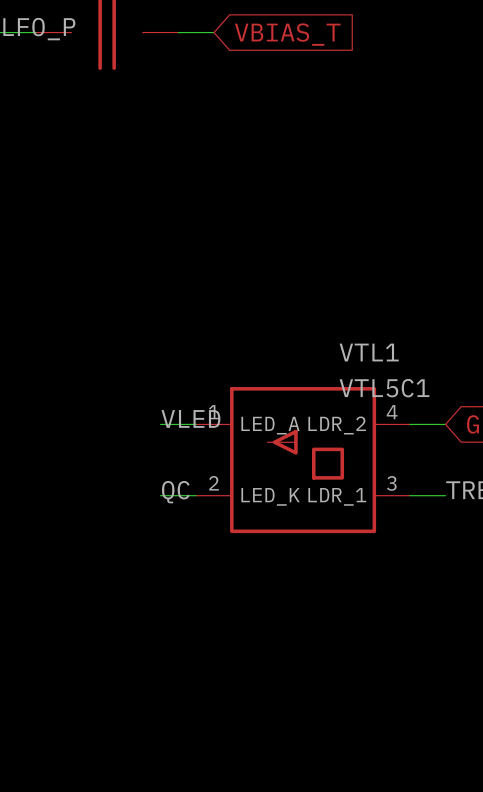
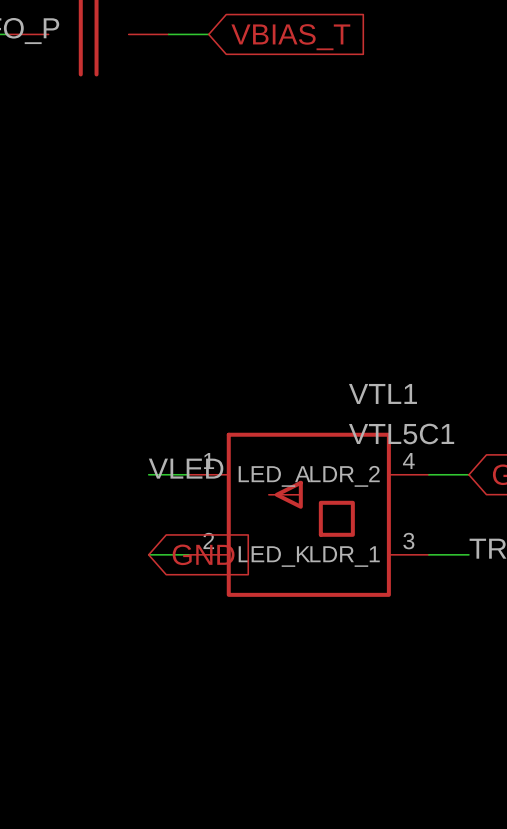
label: QC (175, 492) -> none
global label: none -> GND (203, 554)

